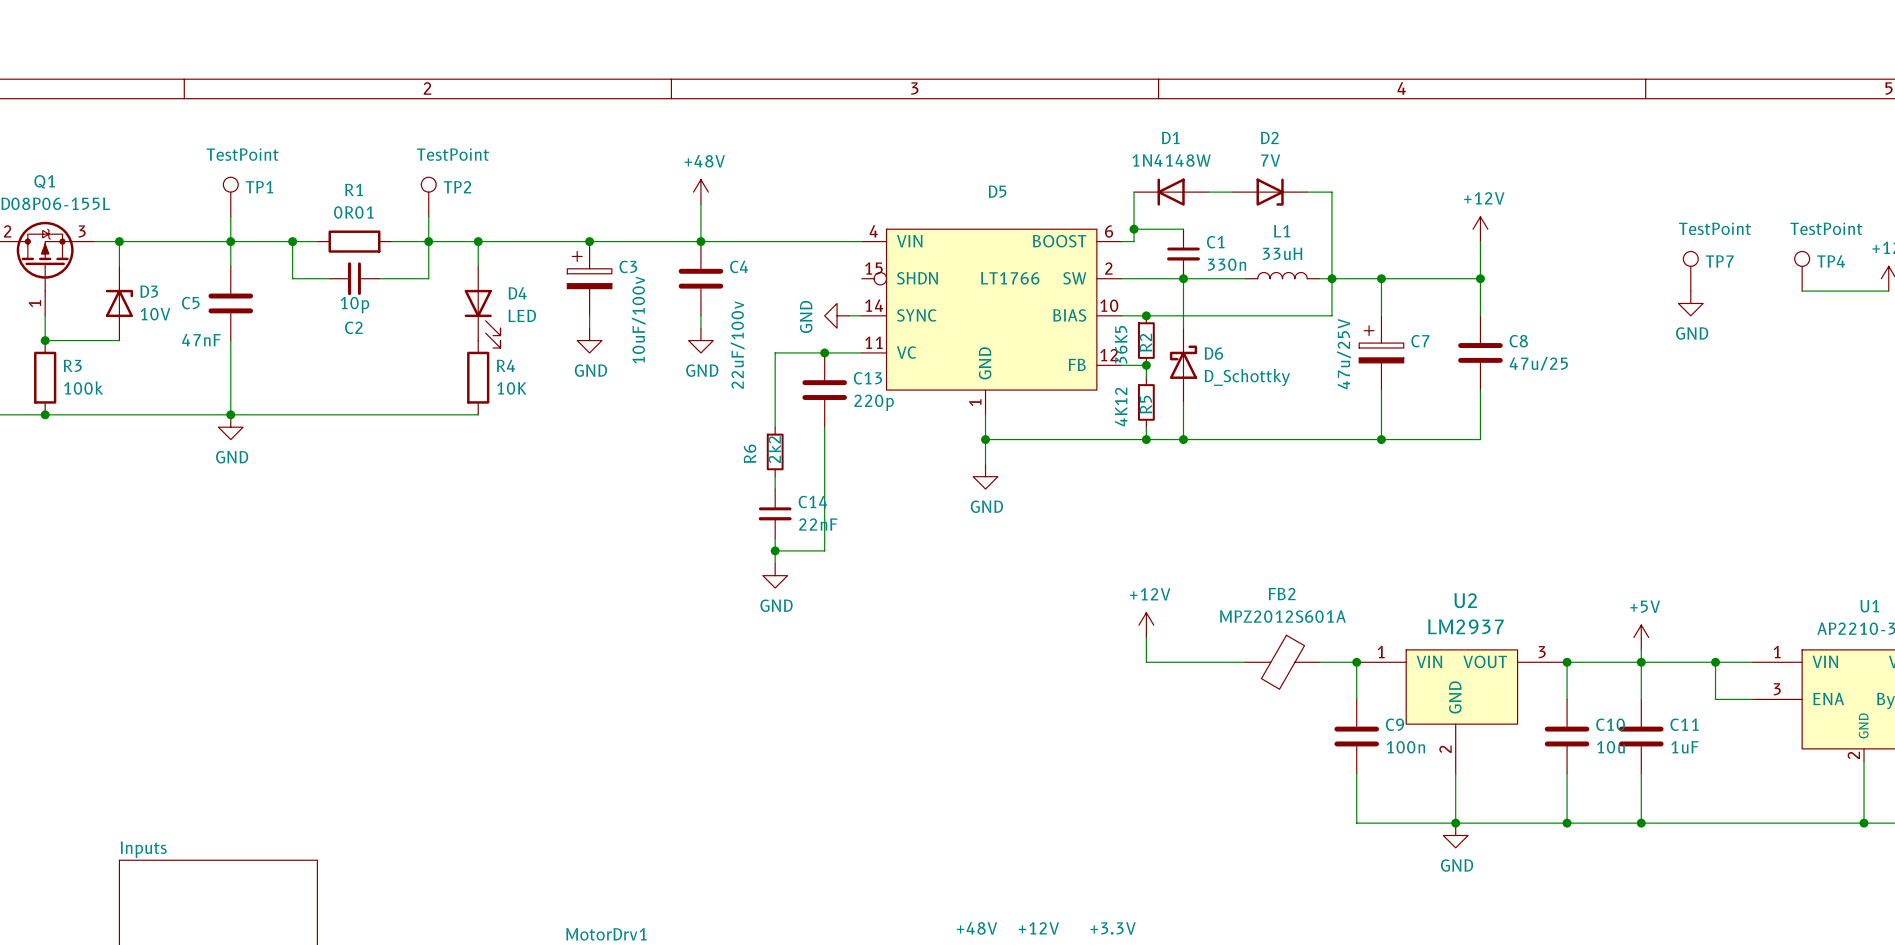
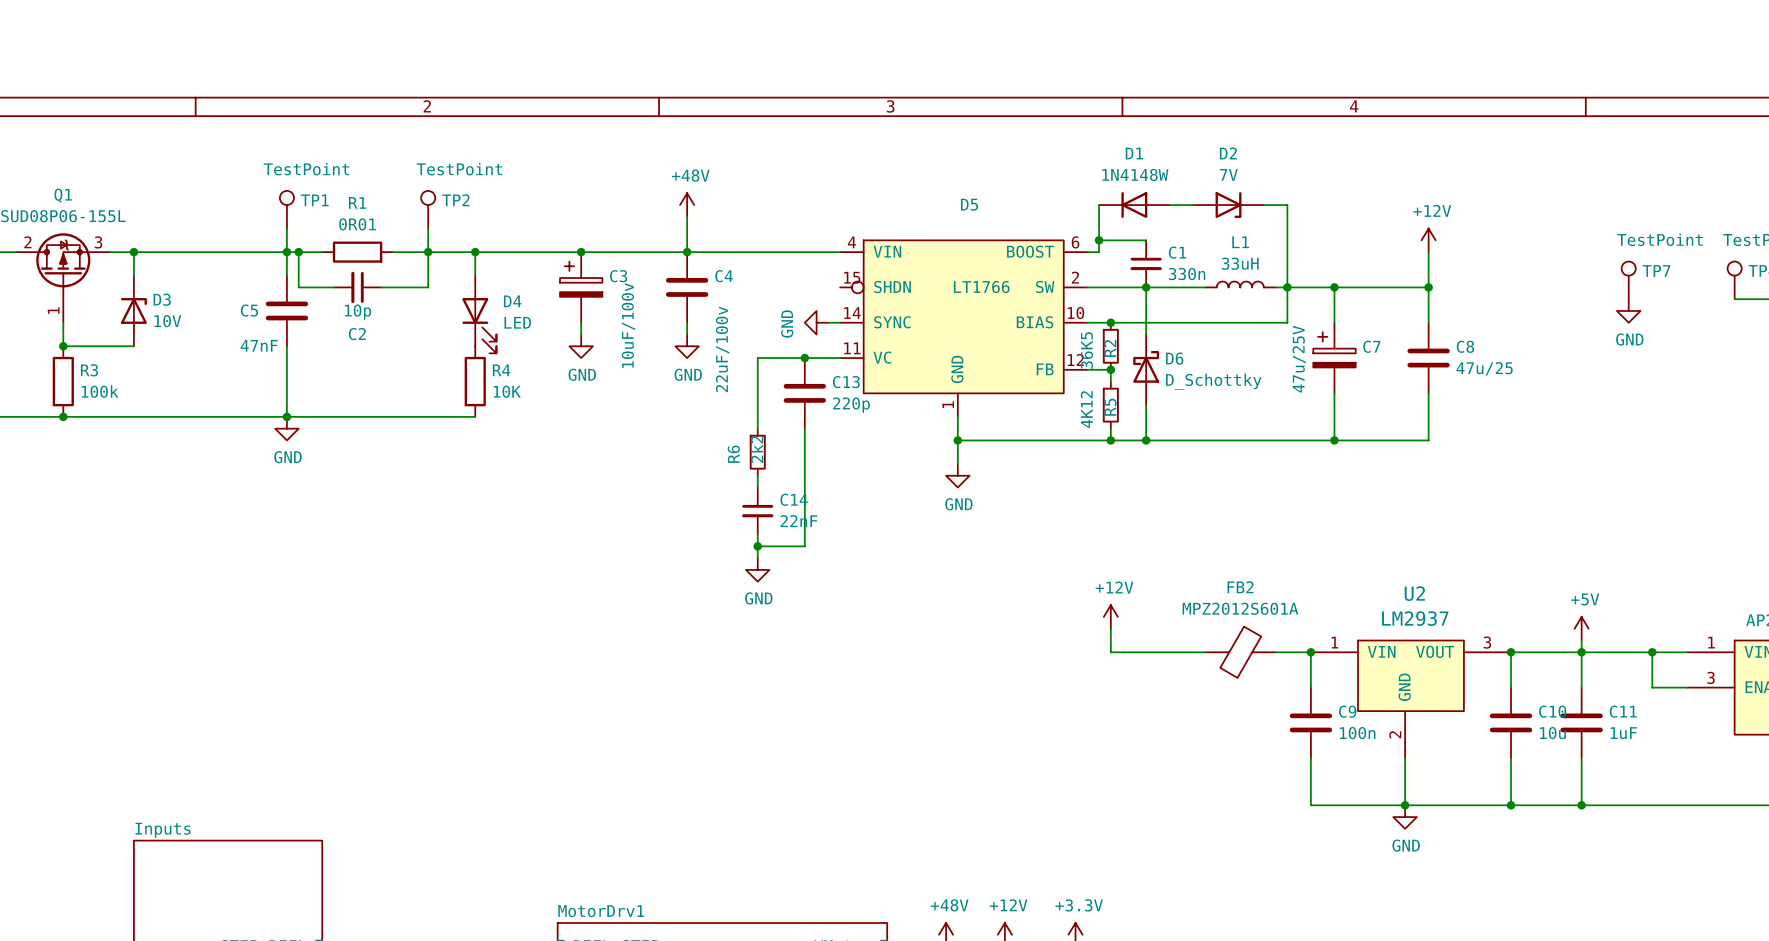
TP1 position: (230, 197) -> (286, 209)
wire: (230, 216) (230, 266) -> (286, 228) (286, 275)
junction position: (230, 241) -> (286, 252)
C5 position: (230, 303) -> (286, 310)
wire: (230, 340) (230, 414) -> (286, 346) (286, 416)
junction position: (230, 414) -> (286, 416)
power symbol position: GND (230, 427) -> GND (286, 428)

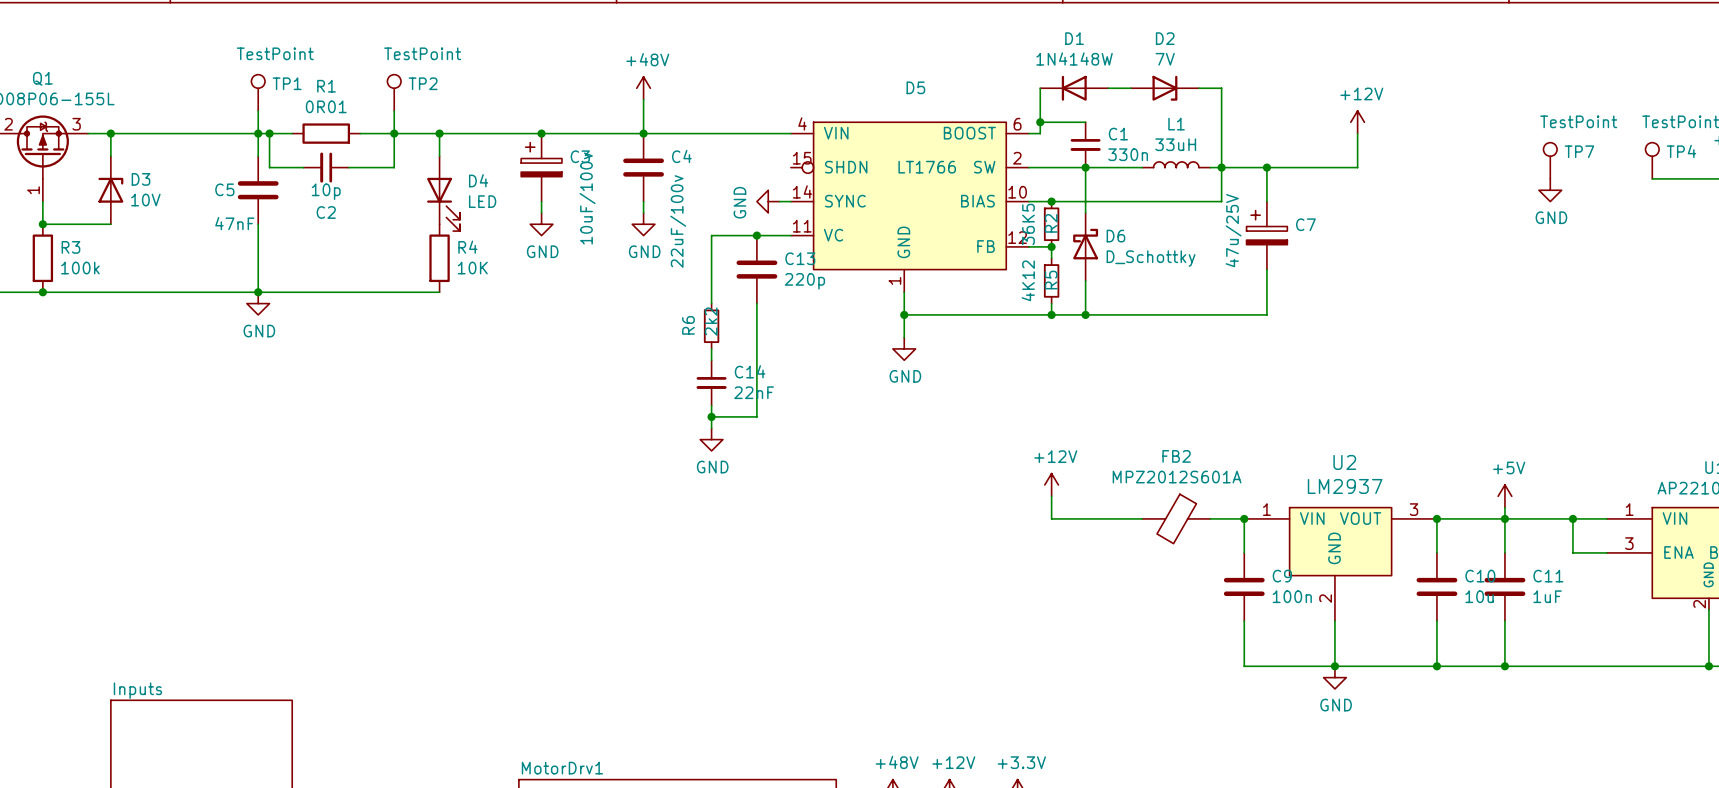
wire: (1428, 287) (1428, 322) -> none
junction: (1428, 287) -> none
C8: 47u/25 (1428, 358) -> none
wire: (1428, 393) (1428, 440) (1334, 440) -> none
junction: (1334, 440) -> none

